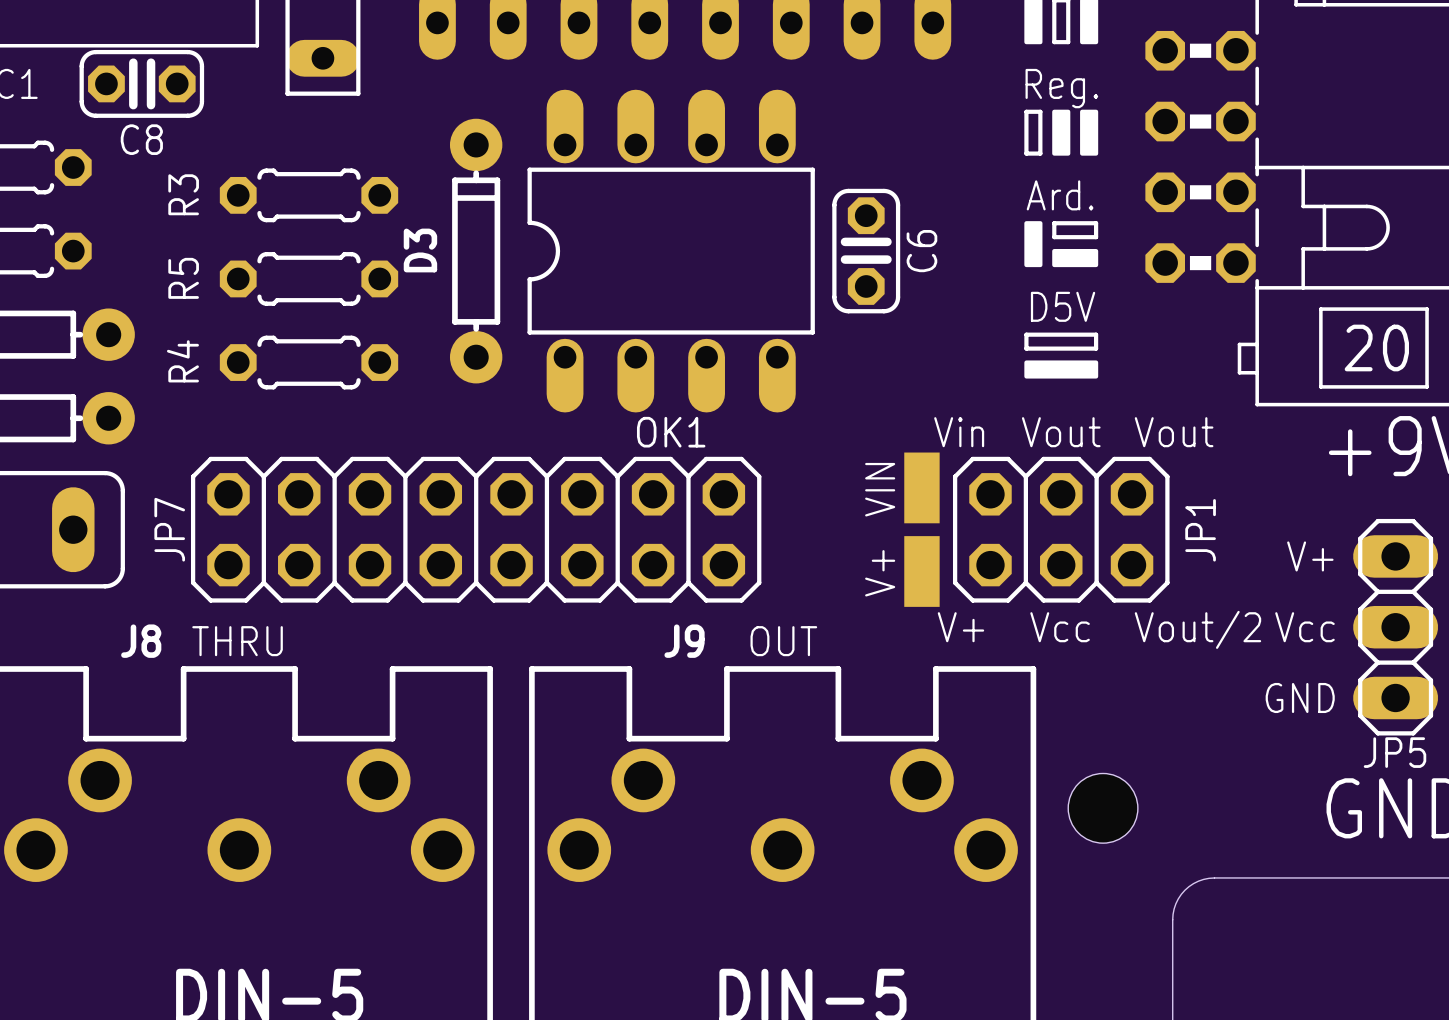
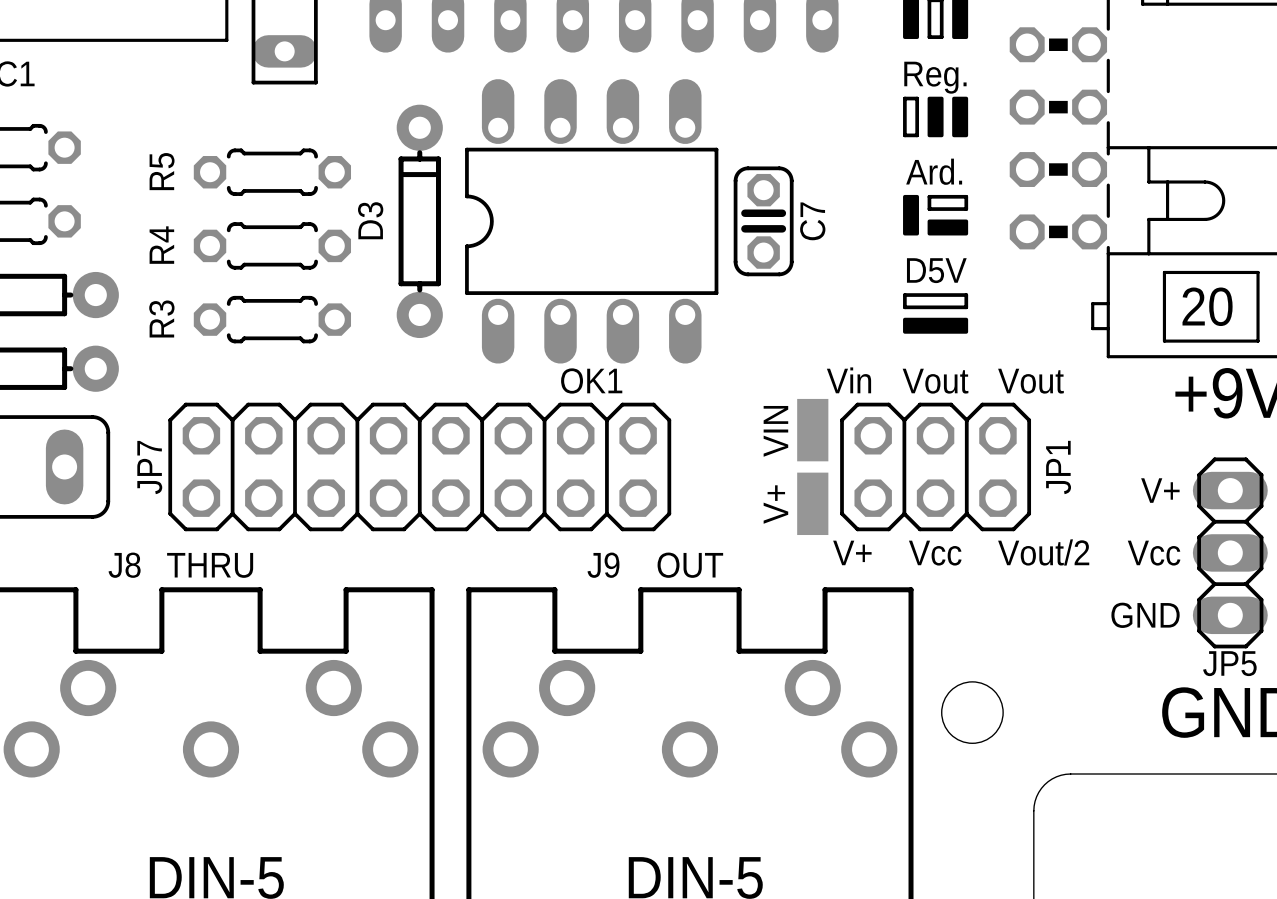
C8: (141, 83) -> none
R3 name: R3 (183, 194) -> R5 (162, 171)
C6 name: C6 (921, 251) -> C7 (812, 221)
R5 name: R5 (183, 278) -> R4 (161, 245)
R4 name: R4 (182, 361) -> R3 (161, 318)

